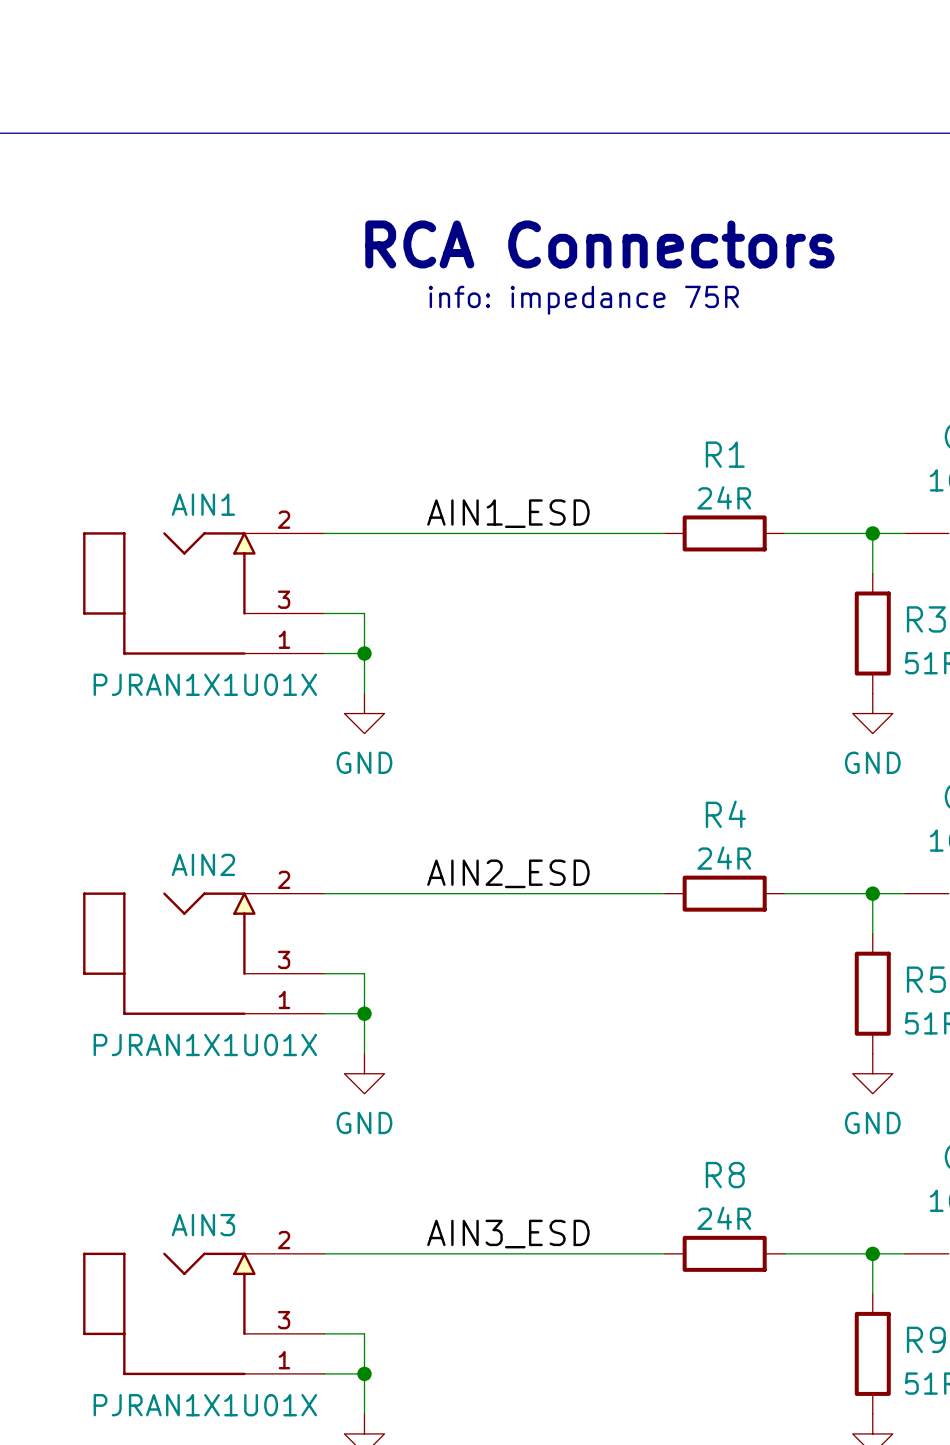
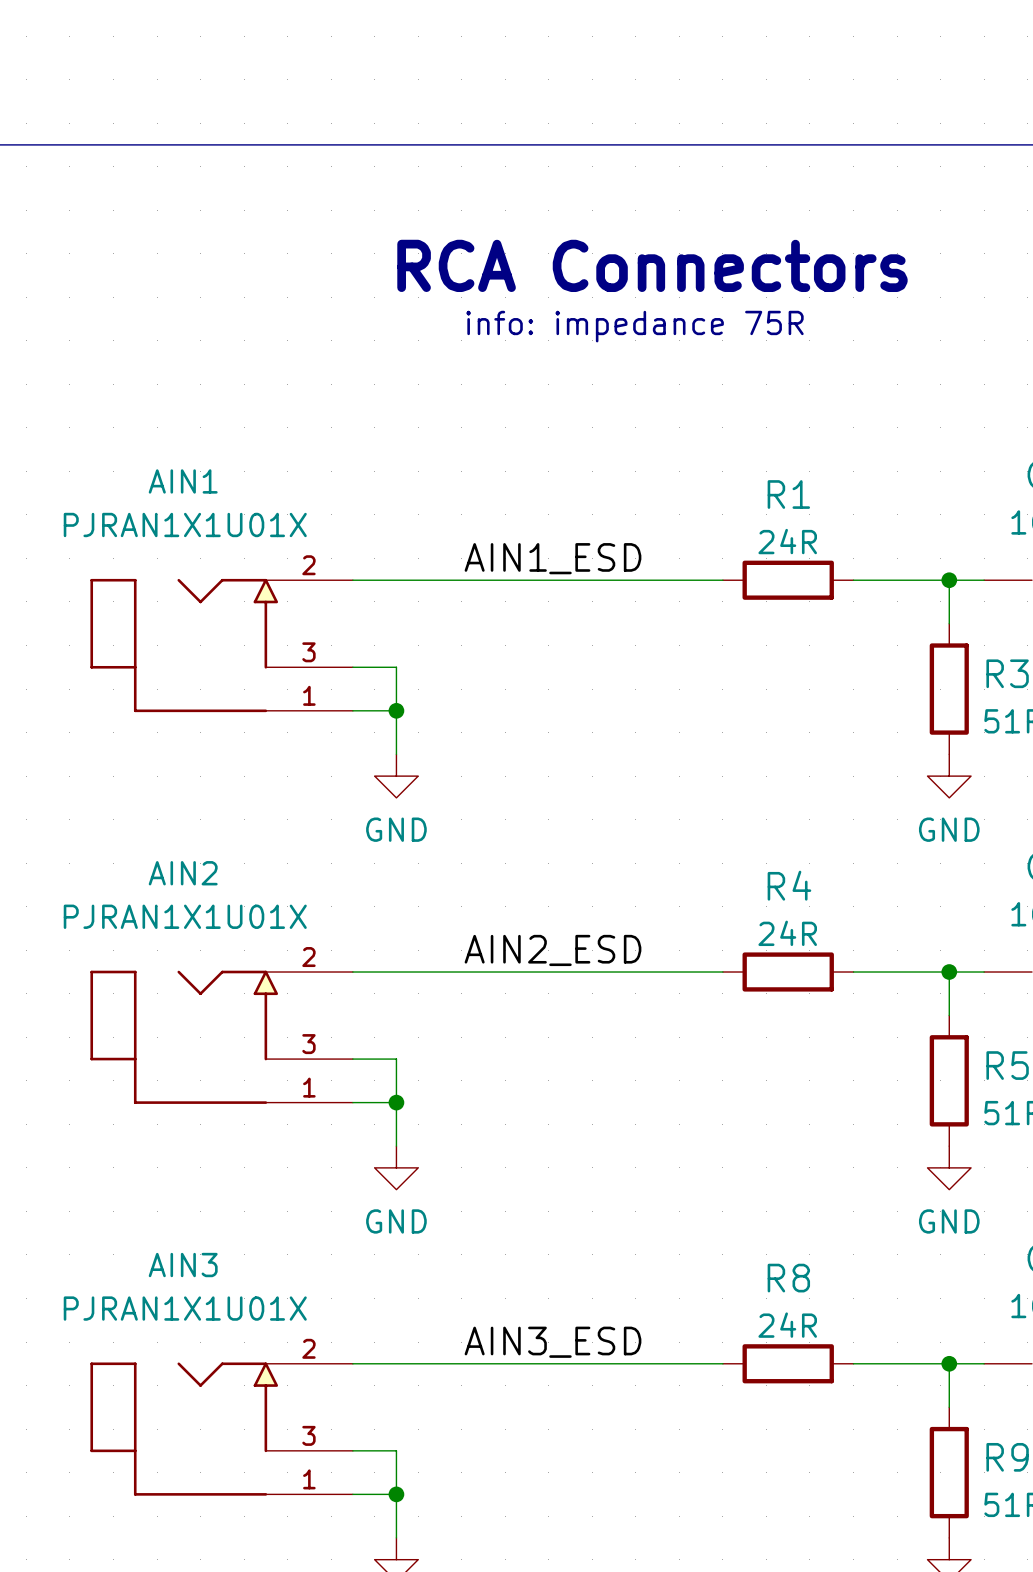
AIN1 name position: AIN1 (203, 504) -> AIN1 (183, 481)
AIN1 value position: PJRAN1X1U01X (205, 684) -> PJRAN1X1U01X (185, 524)
AIN2 name position: AIN2 (203, 864) -> AIN2 (183, 873)
AIN2 value position: PJRAN1X1U01X (205, 1044) -> PJRAN1X1U01X (185, 916)
AIN3 name position: AIN3 (203, 1225) -> AIN3 (183, 1265)
AIN3 value position: PJRAN1X1U01X (205, 1405) -> PJRAN1X1U01X (185, 1308)

